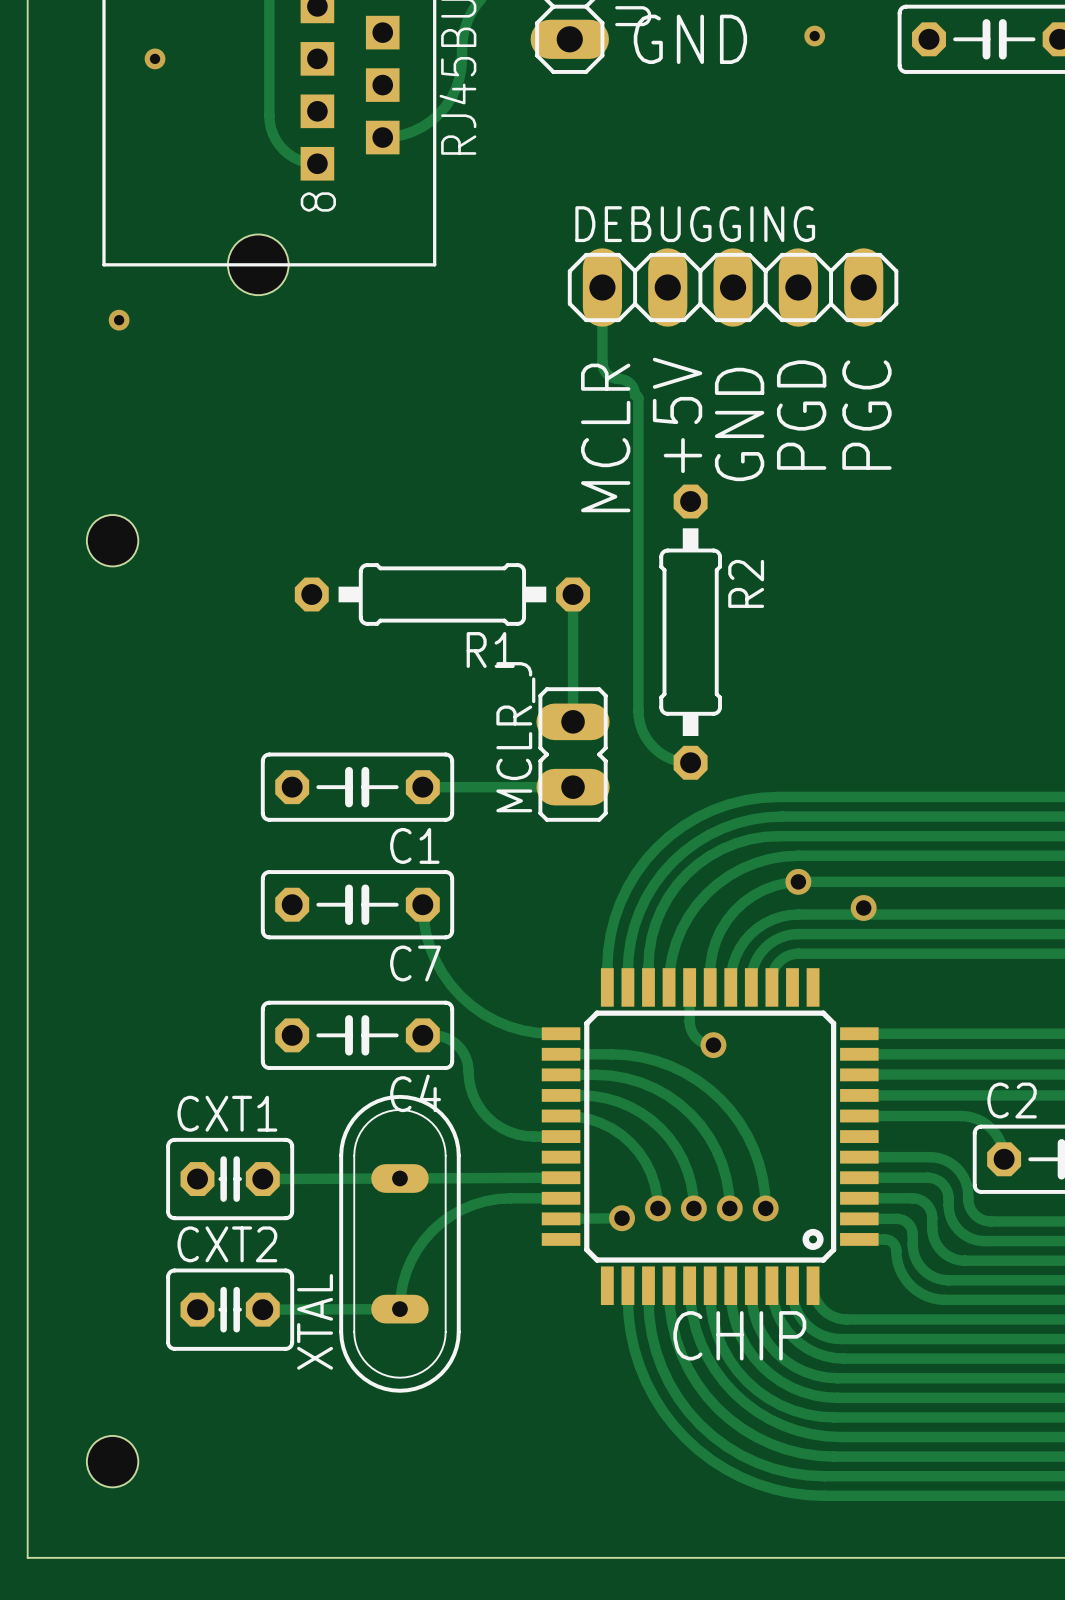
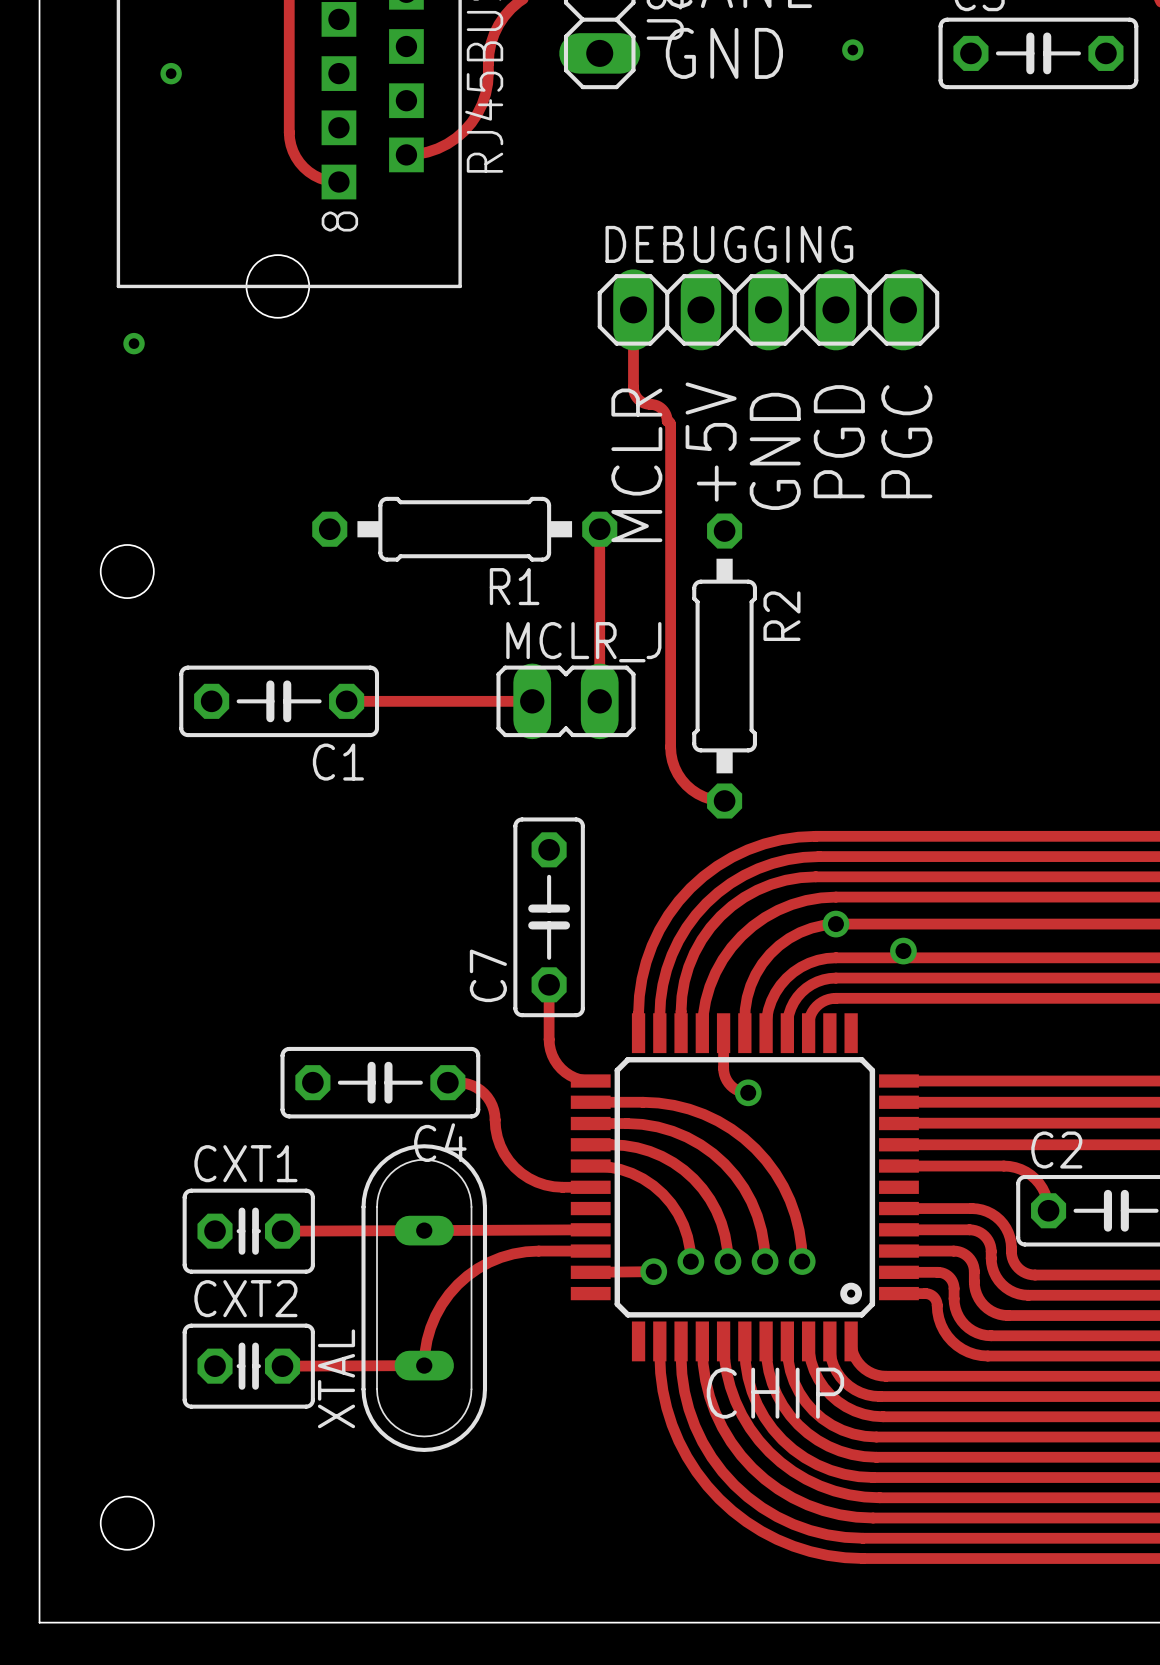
track: none -> (599, 529) (599, 701)
R1 position: (442, 594) -> (464, 529)
track: (573, 594) (573, 721) -> none
track: none -> (346, 701) (532, 701)
MCLR_J rotation: 0° (573, 754) -> 90° clockwise (565, 701)
MCLR_J position: (573, 754) -> (565, 701)
C1 position: (357, 787) -> (279, 701)
track: (422, 787) (573, 787) -> none
C7 rotation: 0° (357, 904) -> 90° clockwise (549, 917)
C7 position: (357, 904) -> (549, 917)
track: (422, 904) (423, 919) (430, 947) (442, 973) (460, 995) (483, 1013) (509, 1026) (537, 1032) (561, 1033) -> (549, 984) (549, 1039) (552, 1055) (557, 1064) (569, 1075) (590, 1081)

